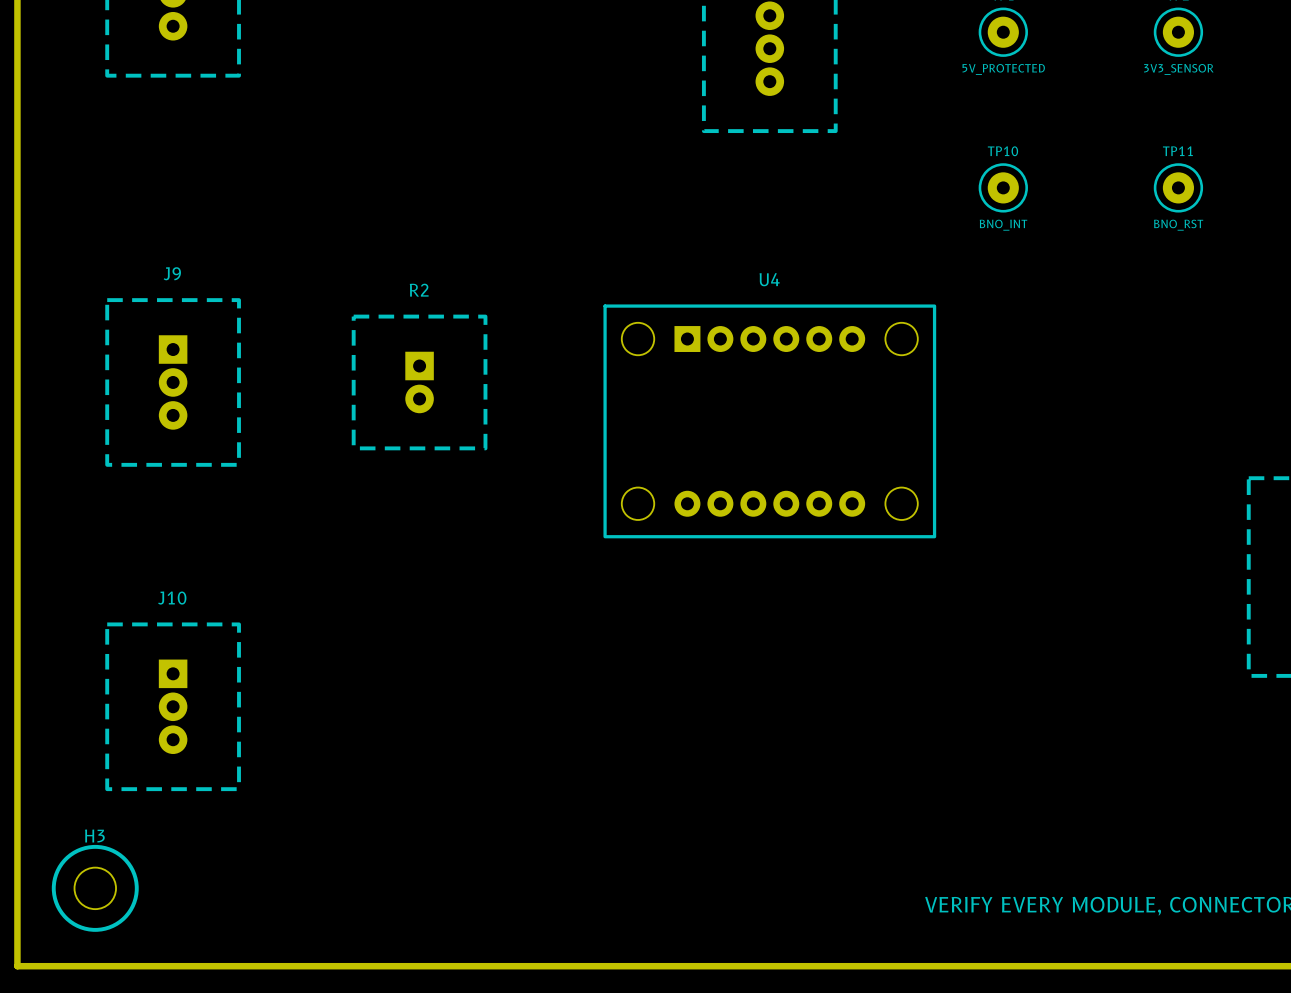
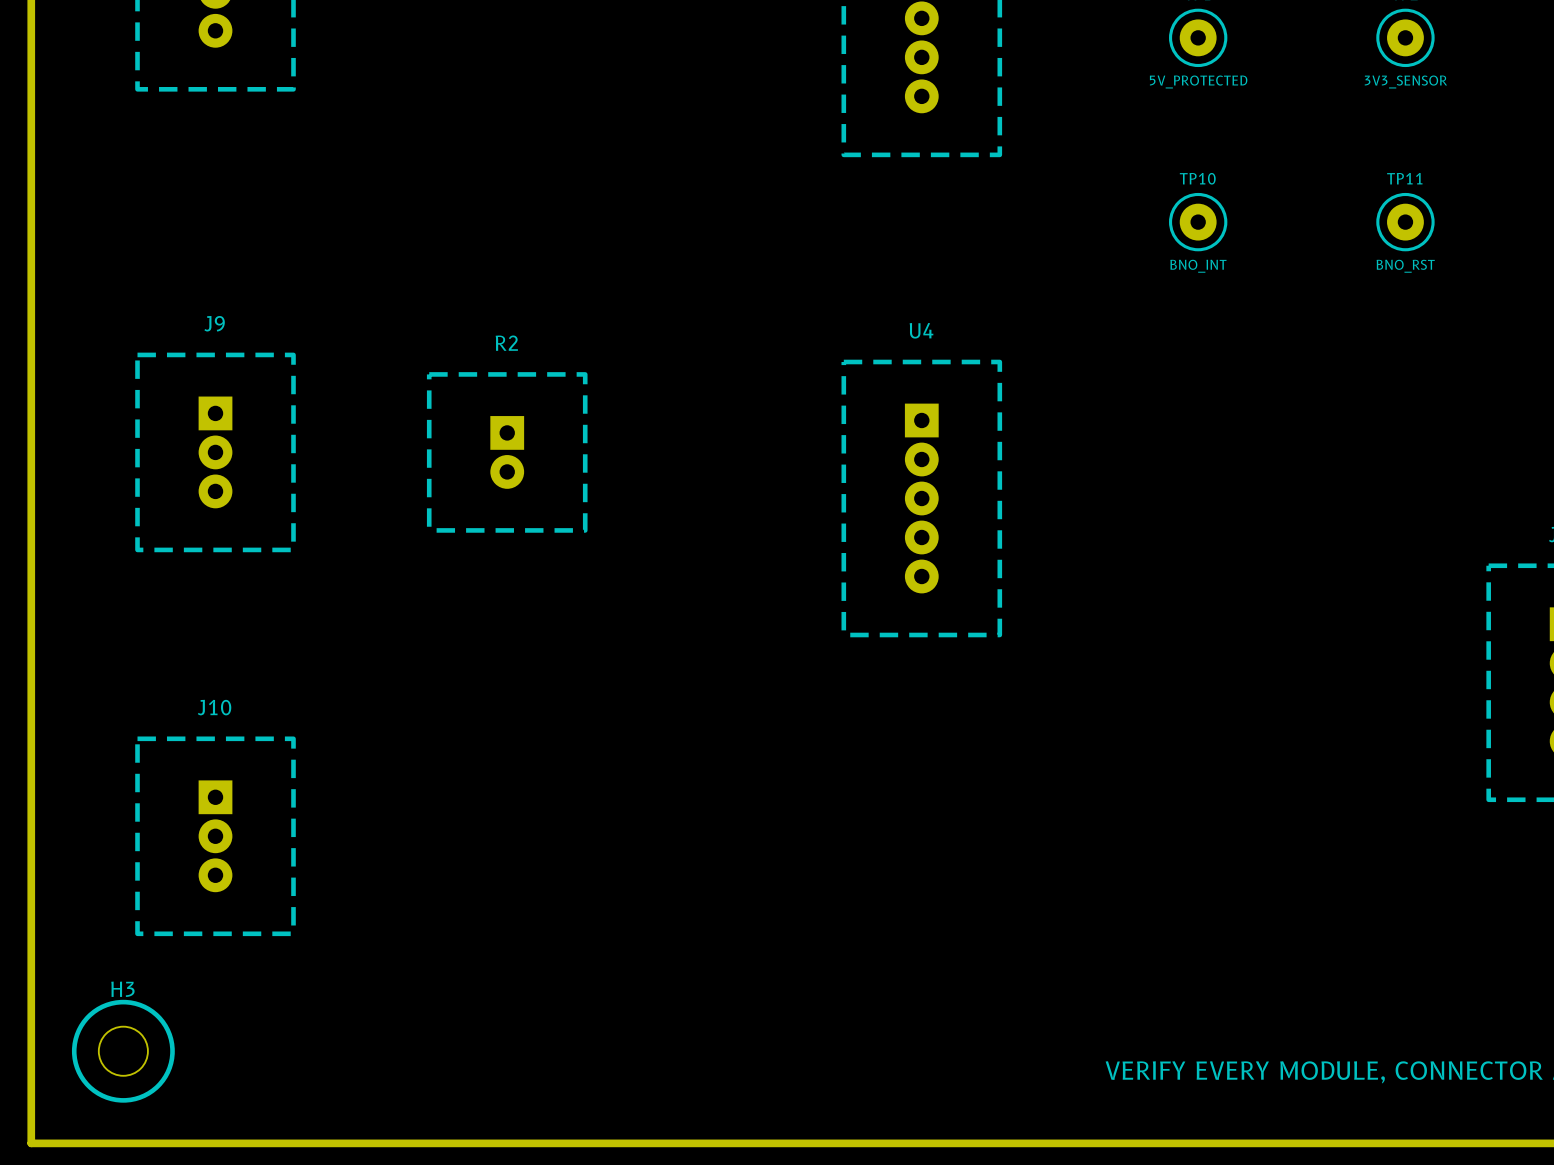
U4 footprint: [603, 304, 937, 539] -> [841, 359, 1003, 638]

